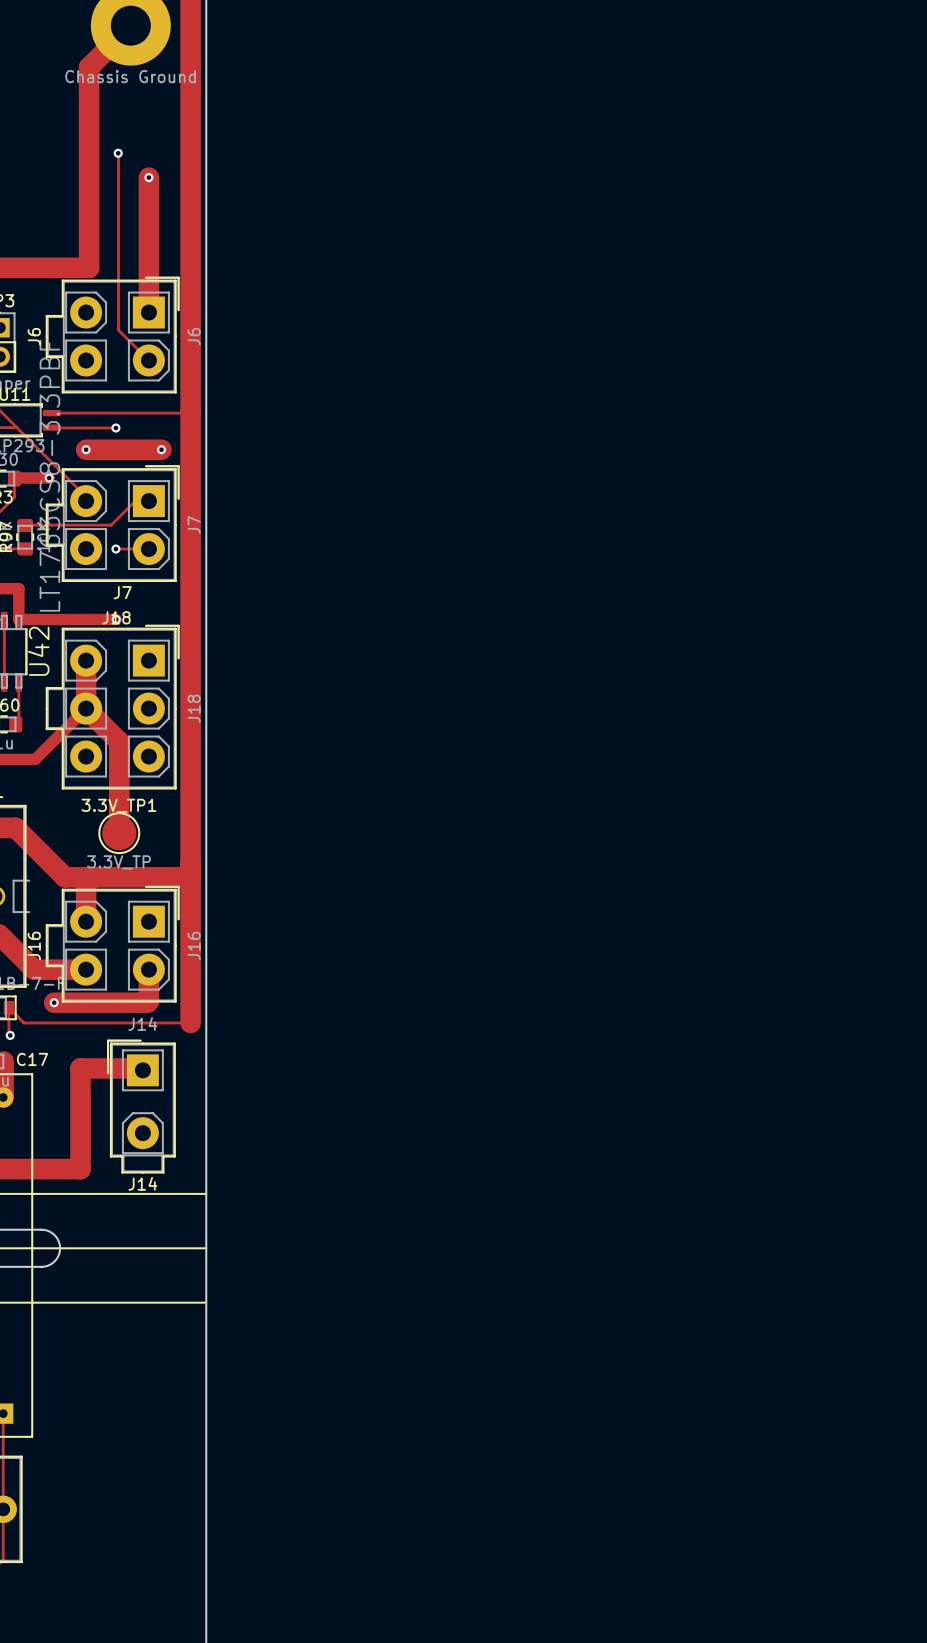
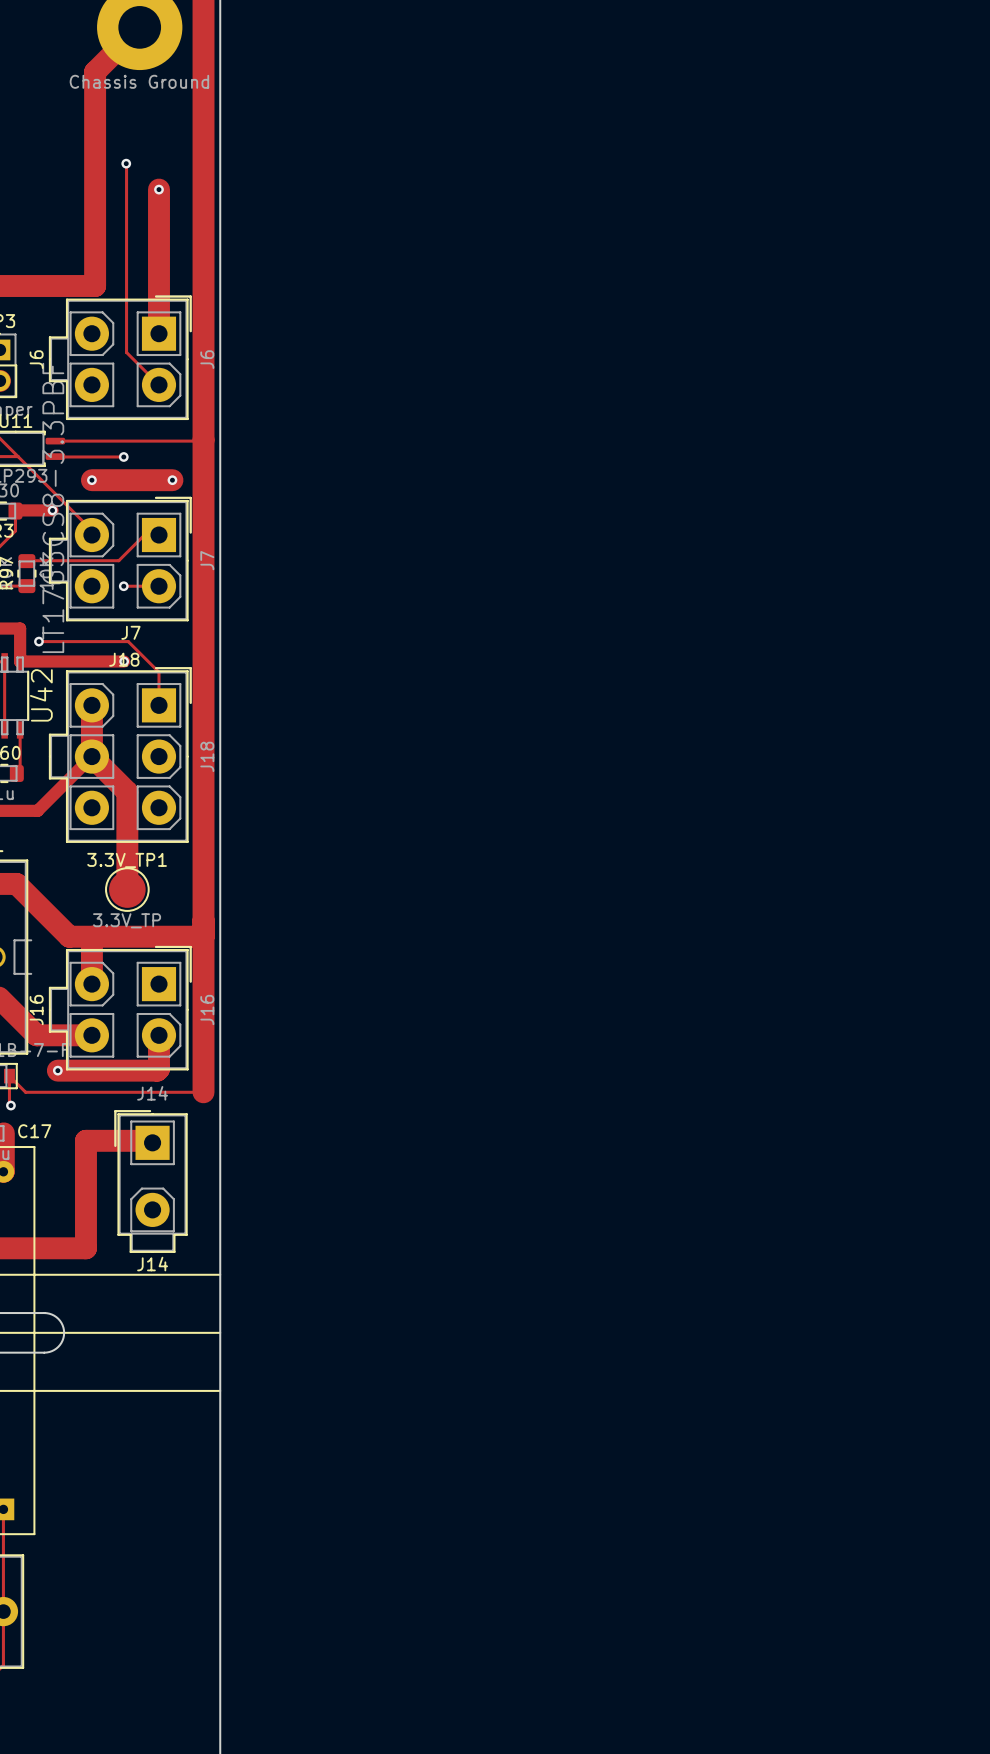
track: none -> (38, 641) (128, 641) (158, 672) (158, 705)
via: none -> (38, 641)

